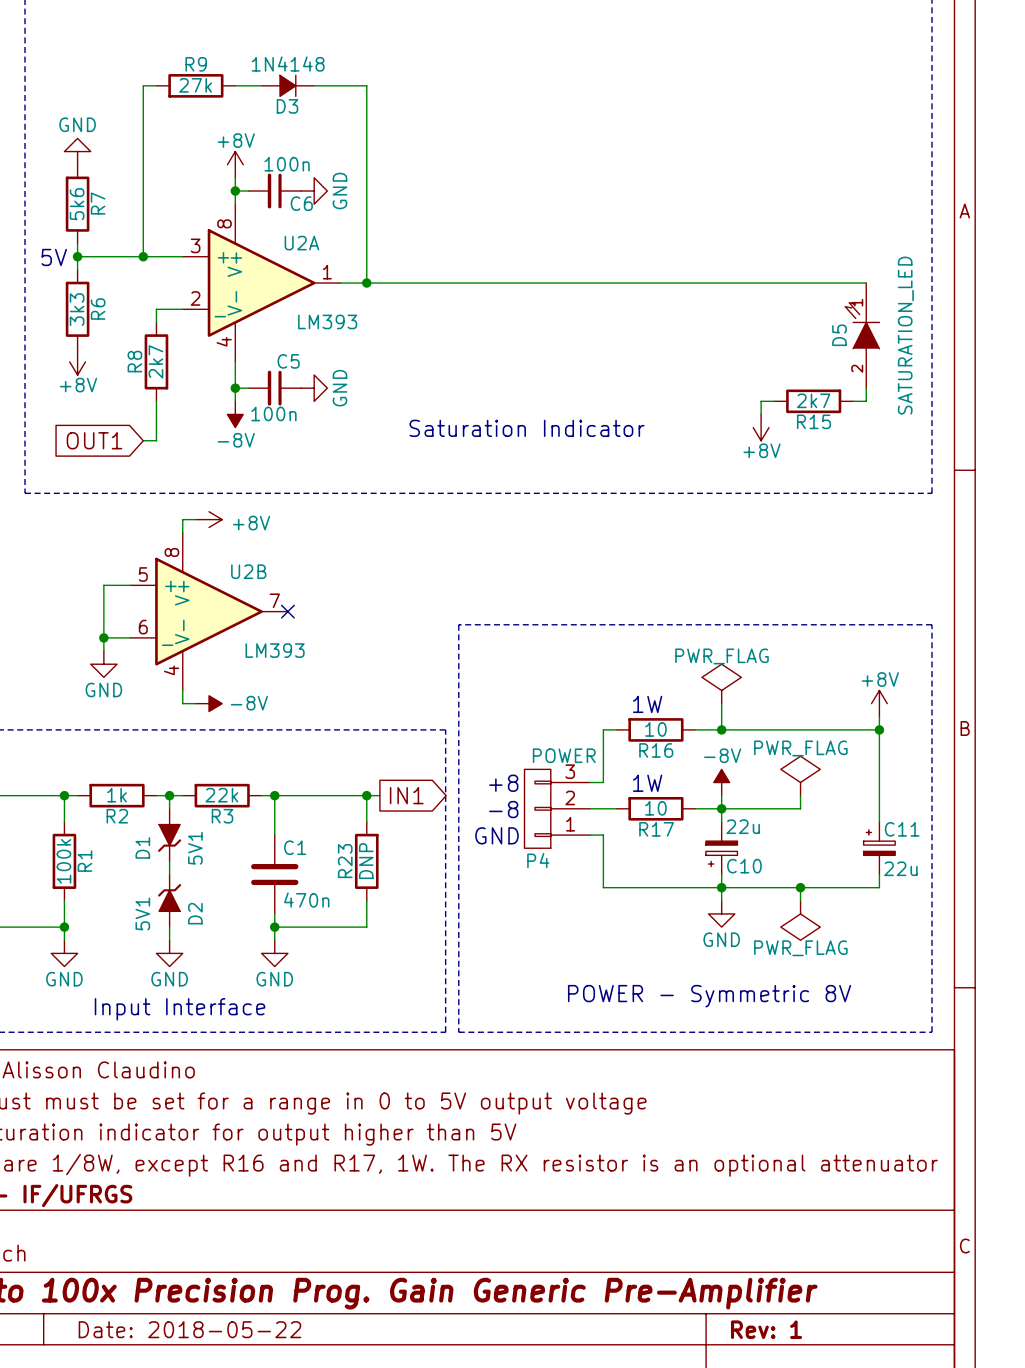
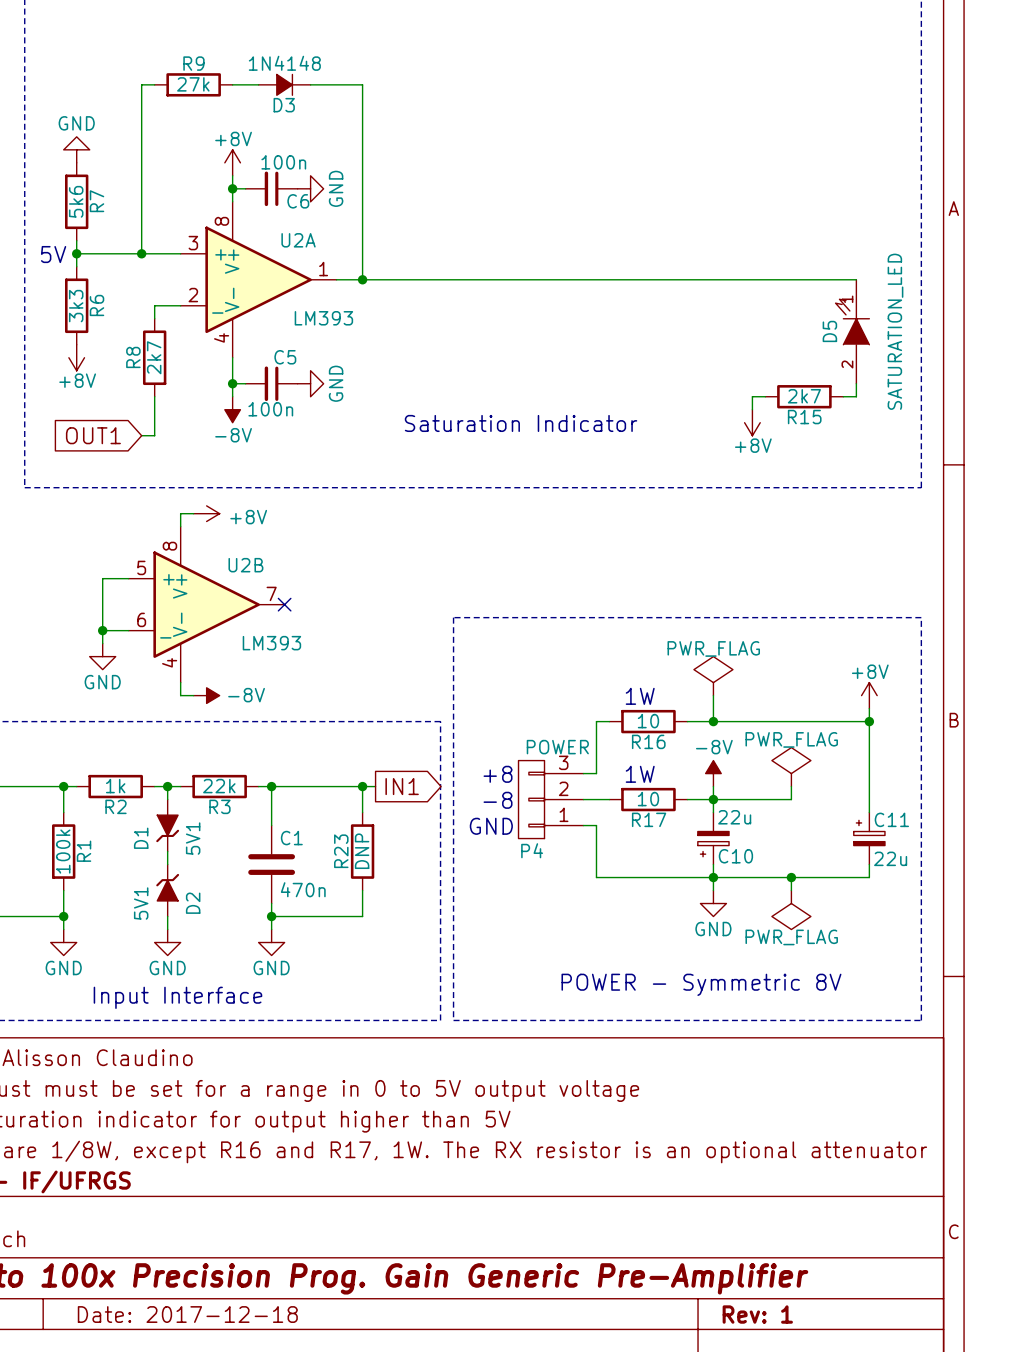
title block: Date: 2018-05-22 (189, 1329) -> Date: 2017-12-18 (187, 1314)

